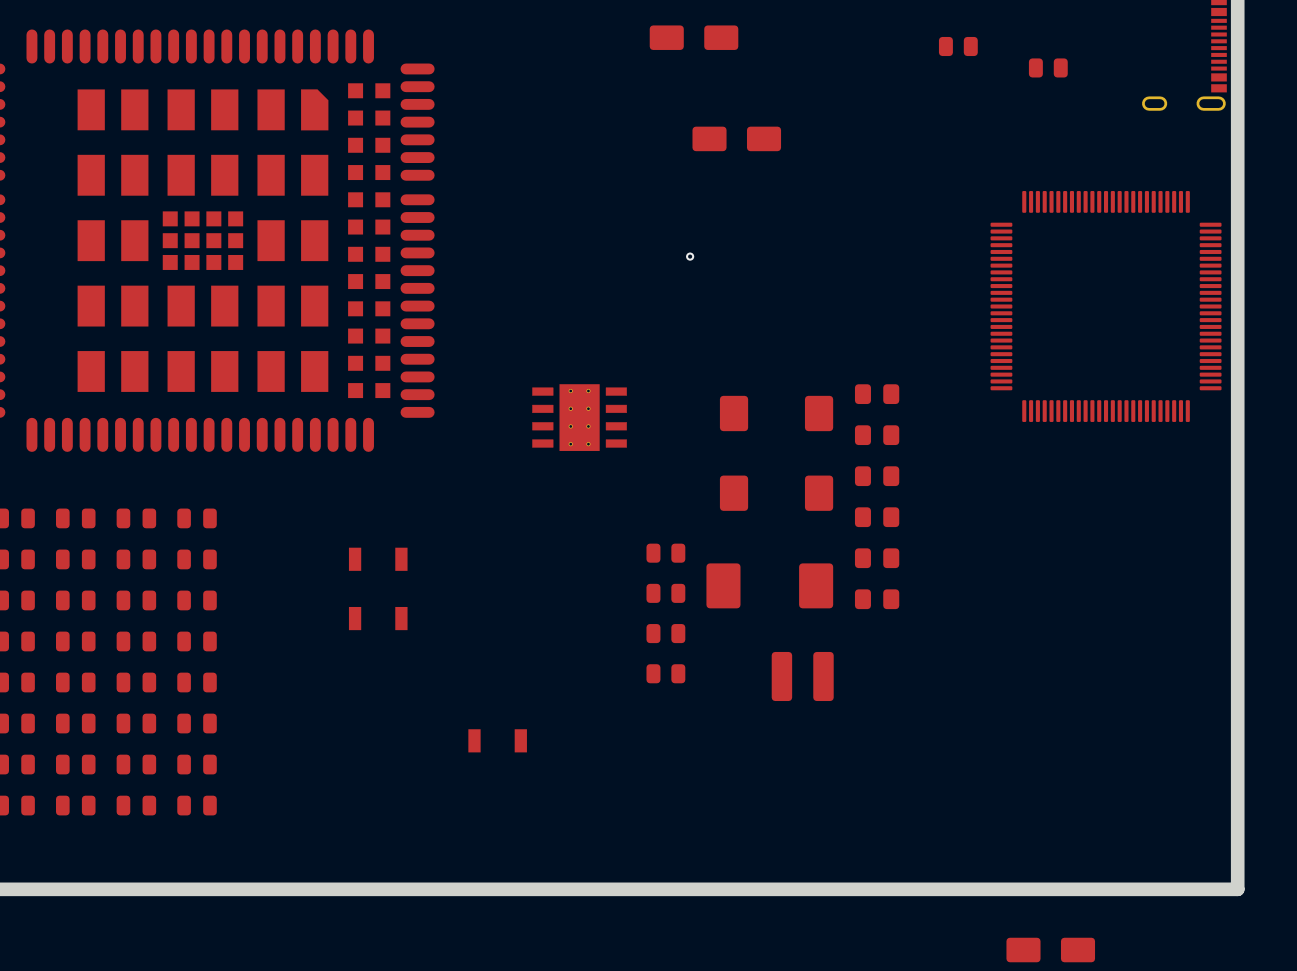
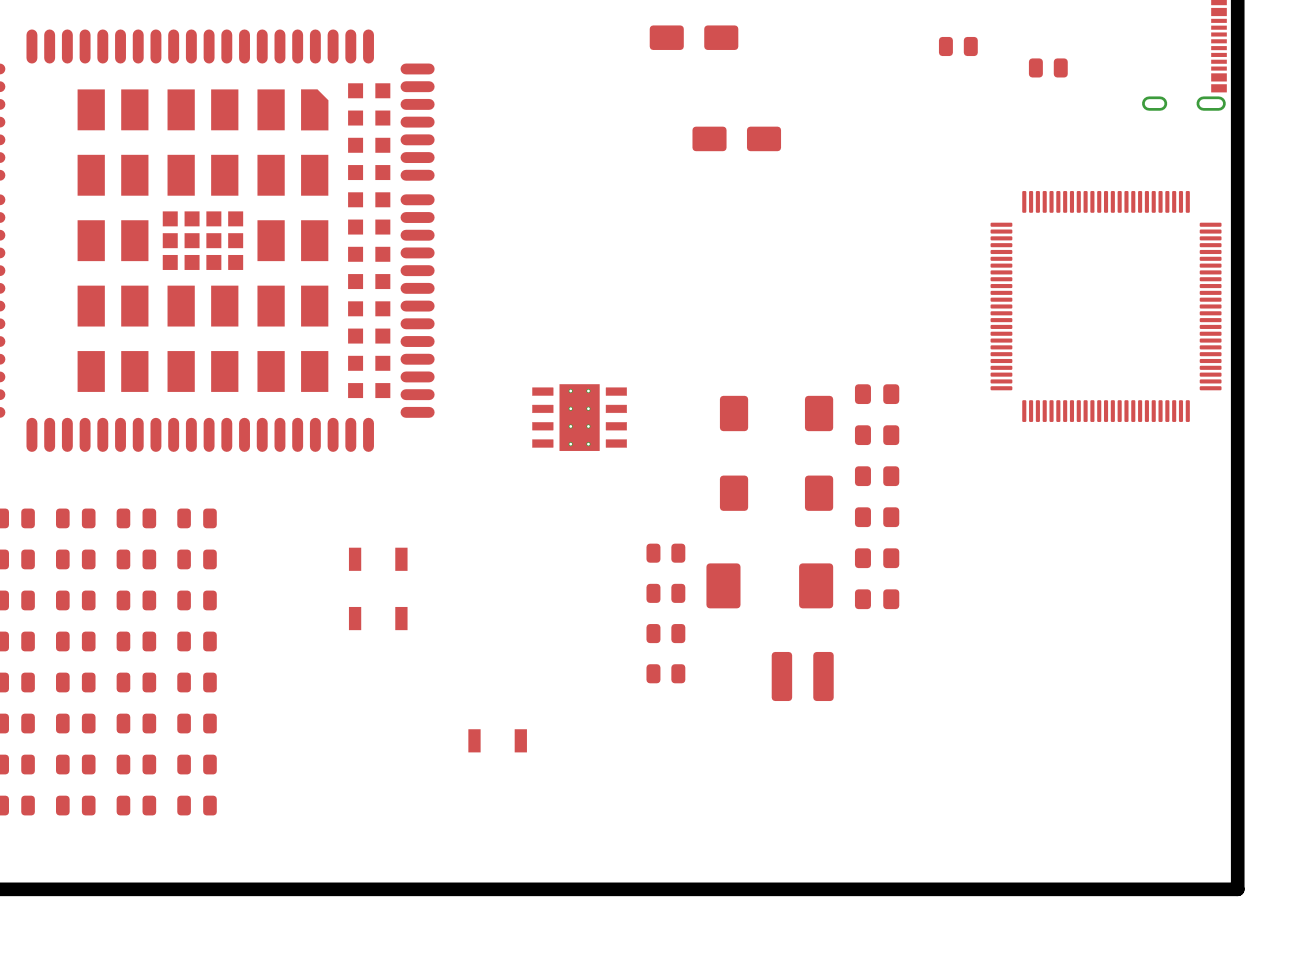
via: (690, 256) -> none
part: (1050, 950) -> none

